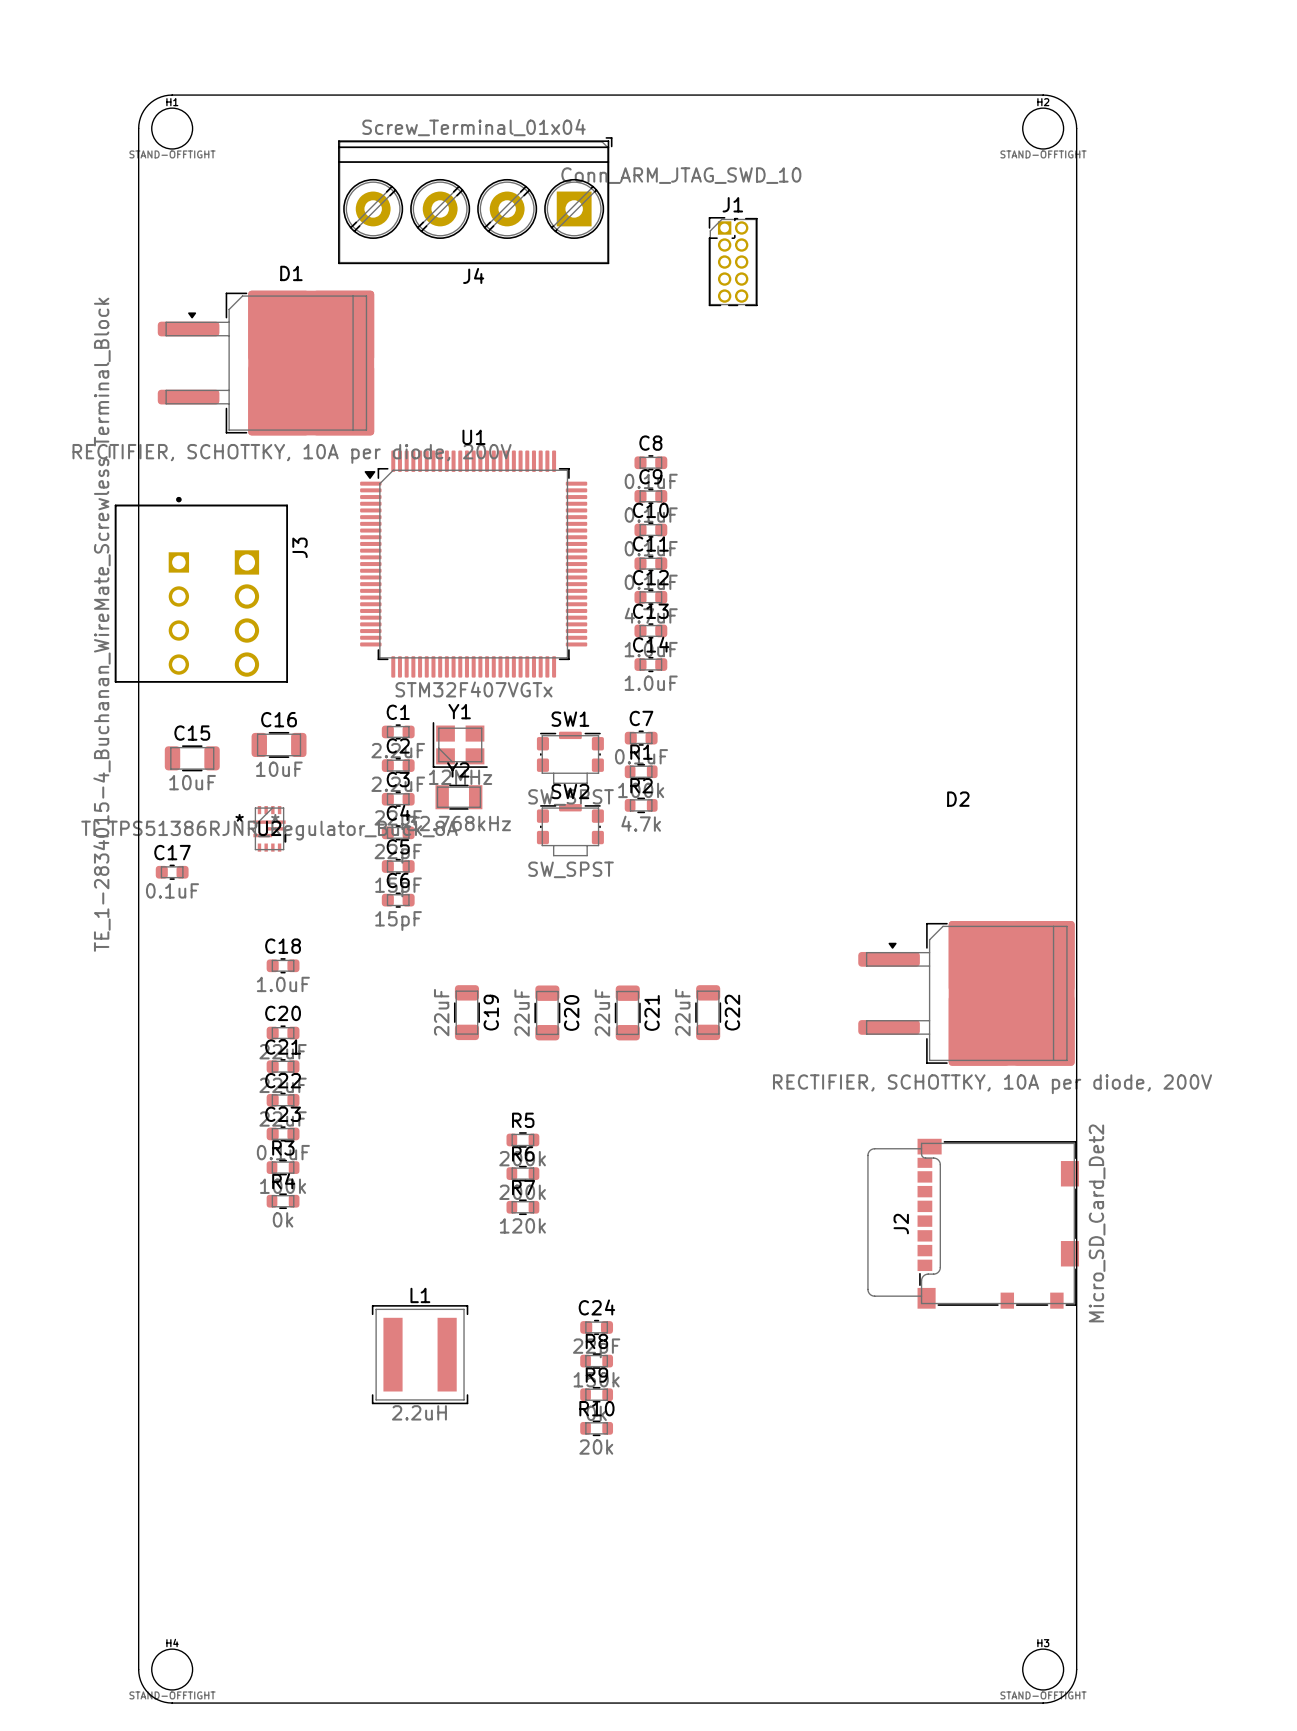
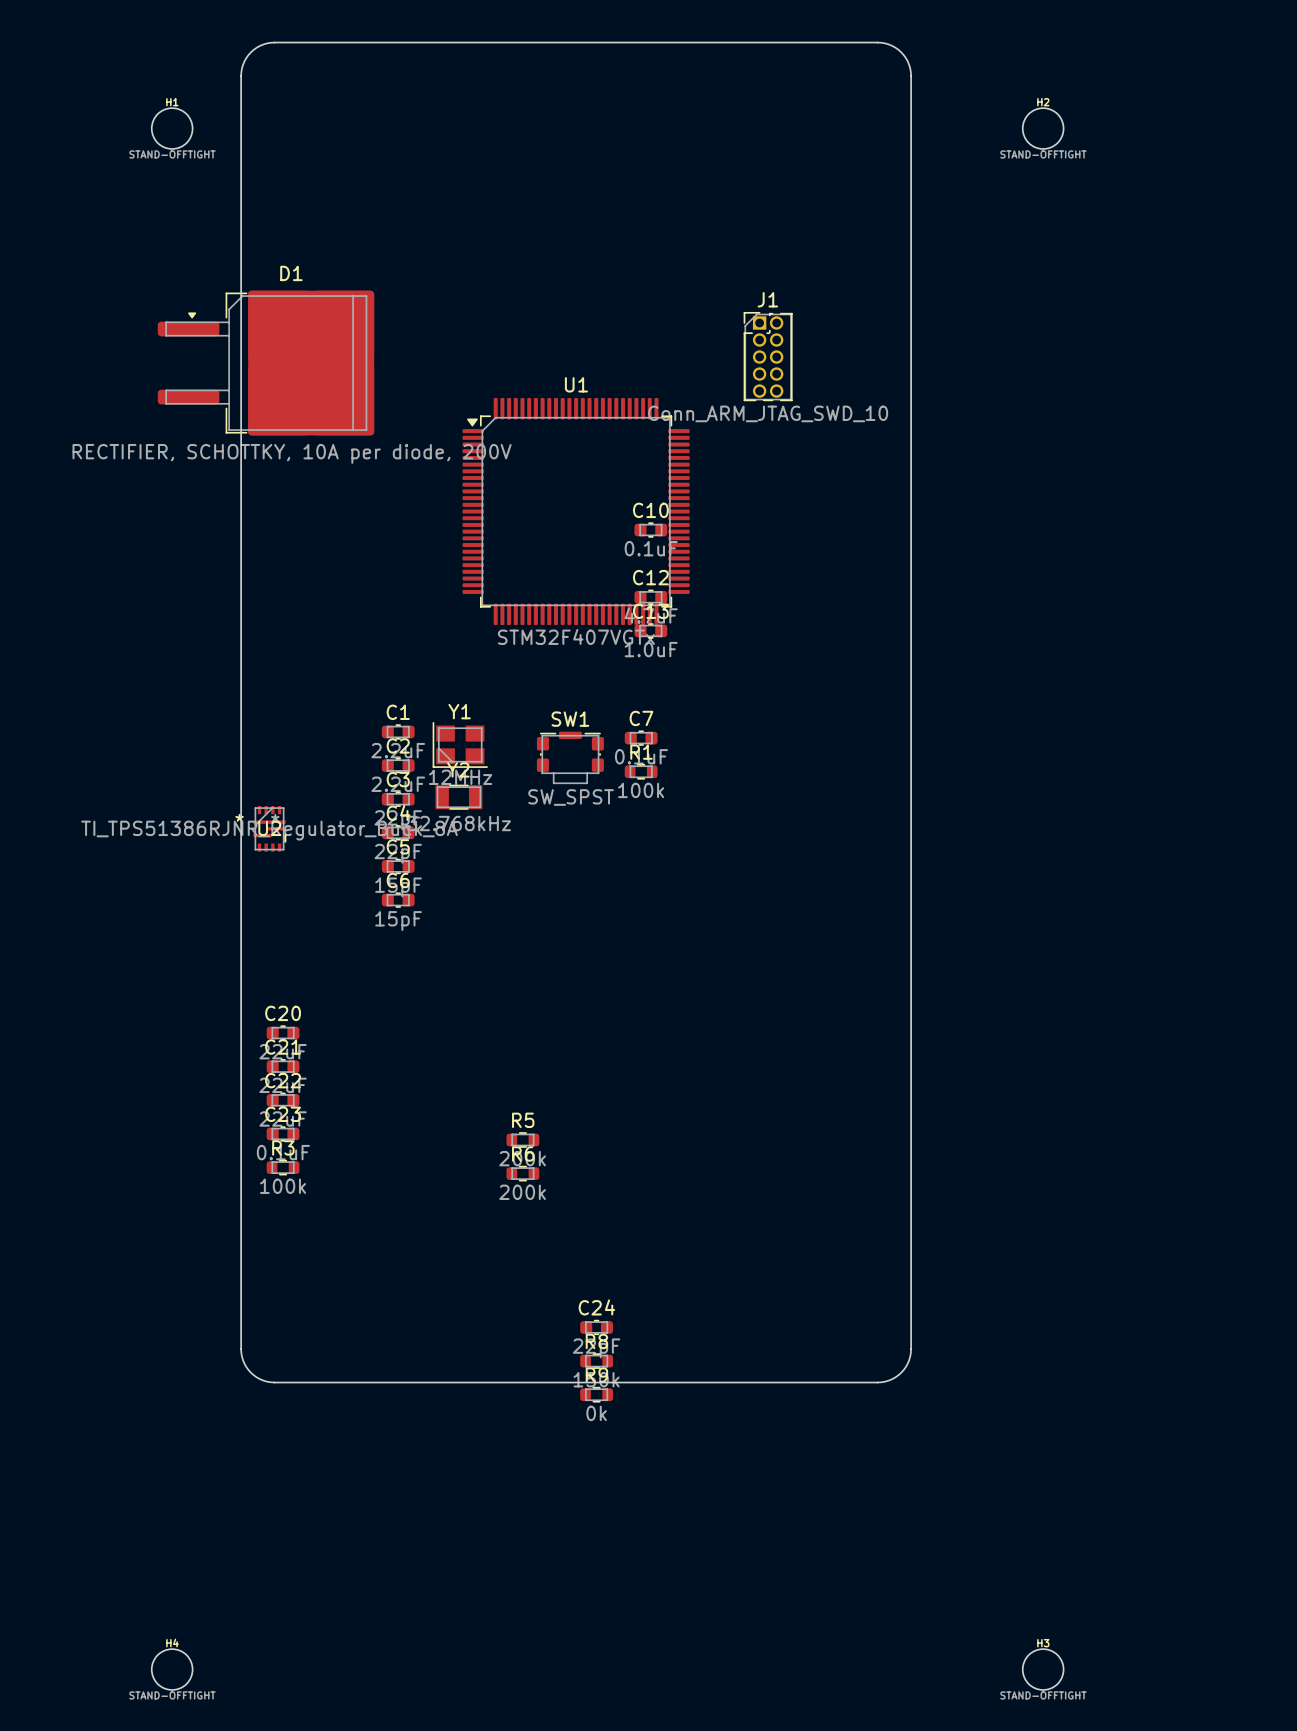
board edge: (172, 95) (1043, 95) (1060, 100) (1071, 110) (1076, 128) (1076, 1669) (1071, 1687) (1060, 1697) (1043, 1703) (172, 1703) (154, 1697) (143, 1687) (138, 1669) (138, 128) (140, 117) (148, 104) (161, 96) (172, 95) -> (274, 42) (260, 45) (250, 52) (244, 61) (241, 76) (241, 1349) (244, 1363) (256, 1377) (274, 1382) (877, 1382) (892, 1379) (905, 1366) (911, 1349) (911, 76) (907, 61) (895, 47) (877, 42) (274, 42)
J1 value position: Conn_ARM_JTAG_SWD_10 (681, 175) -> Conn_ARM_JTAG_SWD_10 (768, 413)
J4: Screw_Terminal_01x04 (475, 200) -> none
J1 position: (733, 261) -> (768, 356)
C8: 0.1uF (650, 462) -> none
C9: 0.1uF (650, 496) -> none
C11: 0.1uF (650, 563) -> none
U1 position: (473, 564) -> (576, 511)
J3: TE_1-2834015-4_Buchanan_WireMate_Screwless_Terminal_Block (201, 589) -> none
C14: 1.0uF (650, 664) -> none
C16: 10uF (279, 744) -> none
C15: 10uF (192, 758) -> none
R2: 4.7k (641, 805) -> none
SW2: SW_SPST (570, 830) -> none
C17: 0.1uF (172, 872) -> none
C18: 1.0uF (283, 965) -> none
D2: RECTIFIER, SCHOTTKY, 10A per diode, 200V (966, 993) -> none
C19: 22uF (466, 1012) -> none
C20: 22uF (547, 1012) -> none
C21: 22uF (627, 1012) -> none
C22: 22uF (708, 1012) -> none
R4: 0k (283, 1201) -> none
R7: 120k (522, 1207) -> none
J2: Micro_SD_Card_Det2 (973, 1223) -> none
L1: 2.2uH (420, 1354) -> none
R10: 20k (596, 1428) -> none

